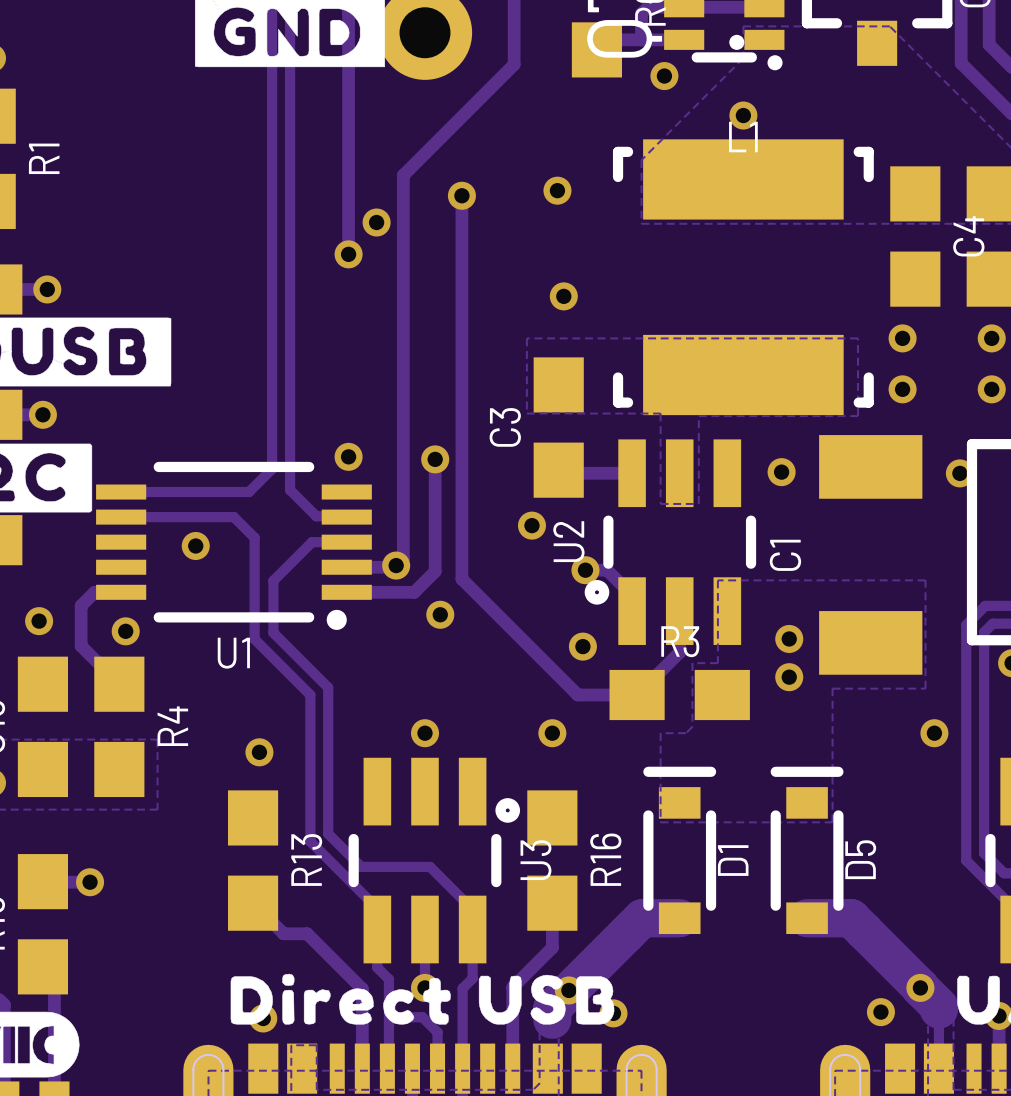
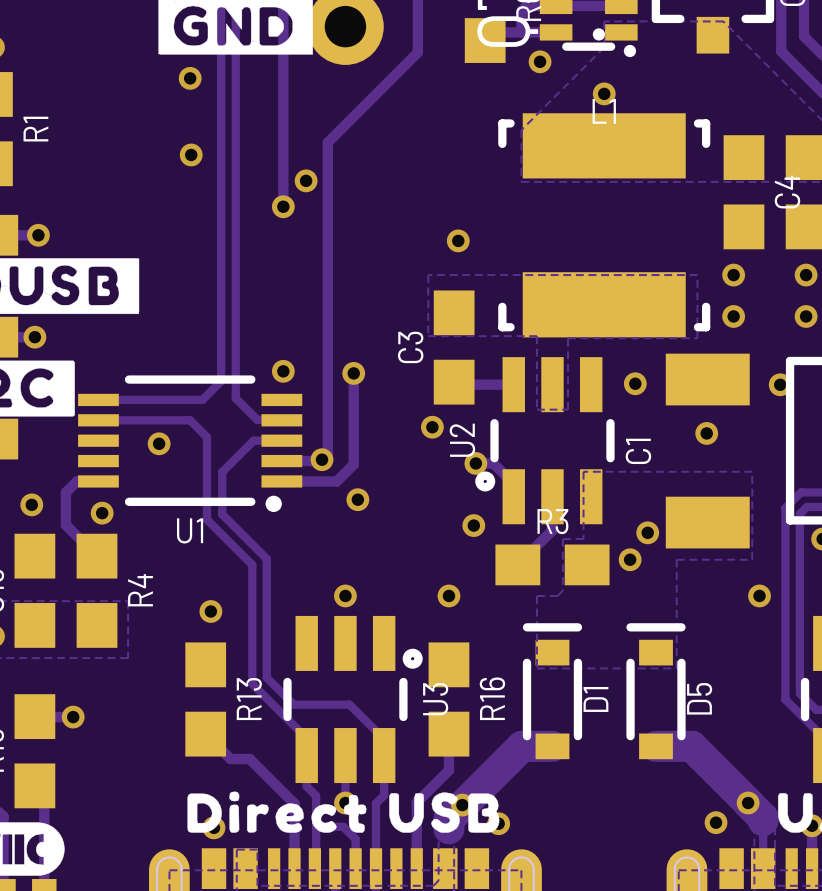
via: none -> (190, 78)
via: none -> (191, 154)
via: (557, 190) -> none
track: (461, 195) (461, 579) (577, 695) (637, 695) -> none
via: (461, 195) -> none
via: none -> (706, 433)
via: (789, 638) -> none
via: none -> (647, 532)
via: (789, 677) -> none
via: none -> (630, 559)

